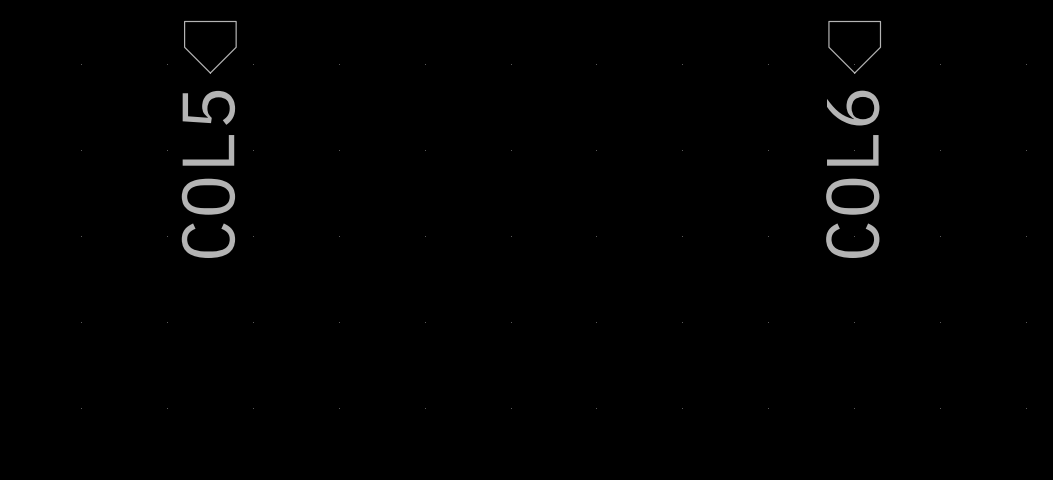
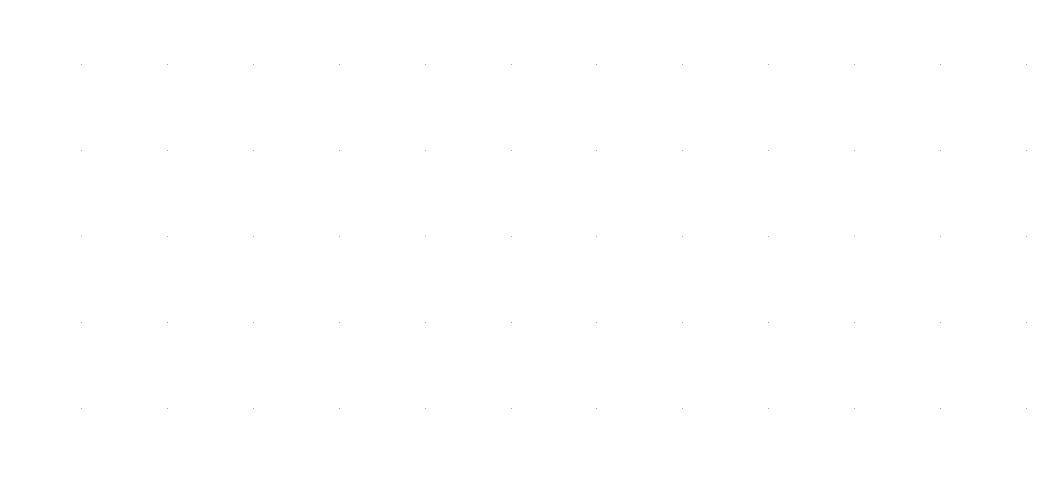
hierarchical label: COL5 (208, 174) -> none
hierarchical label: COL6 (852, 174) -> none

